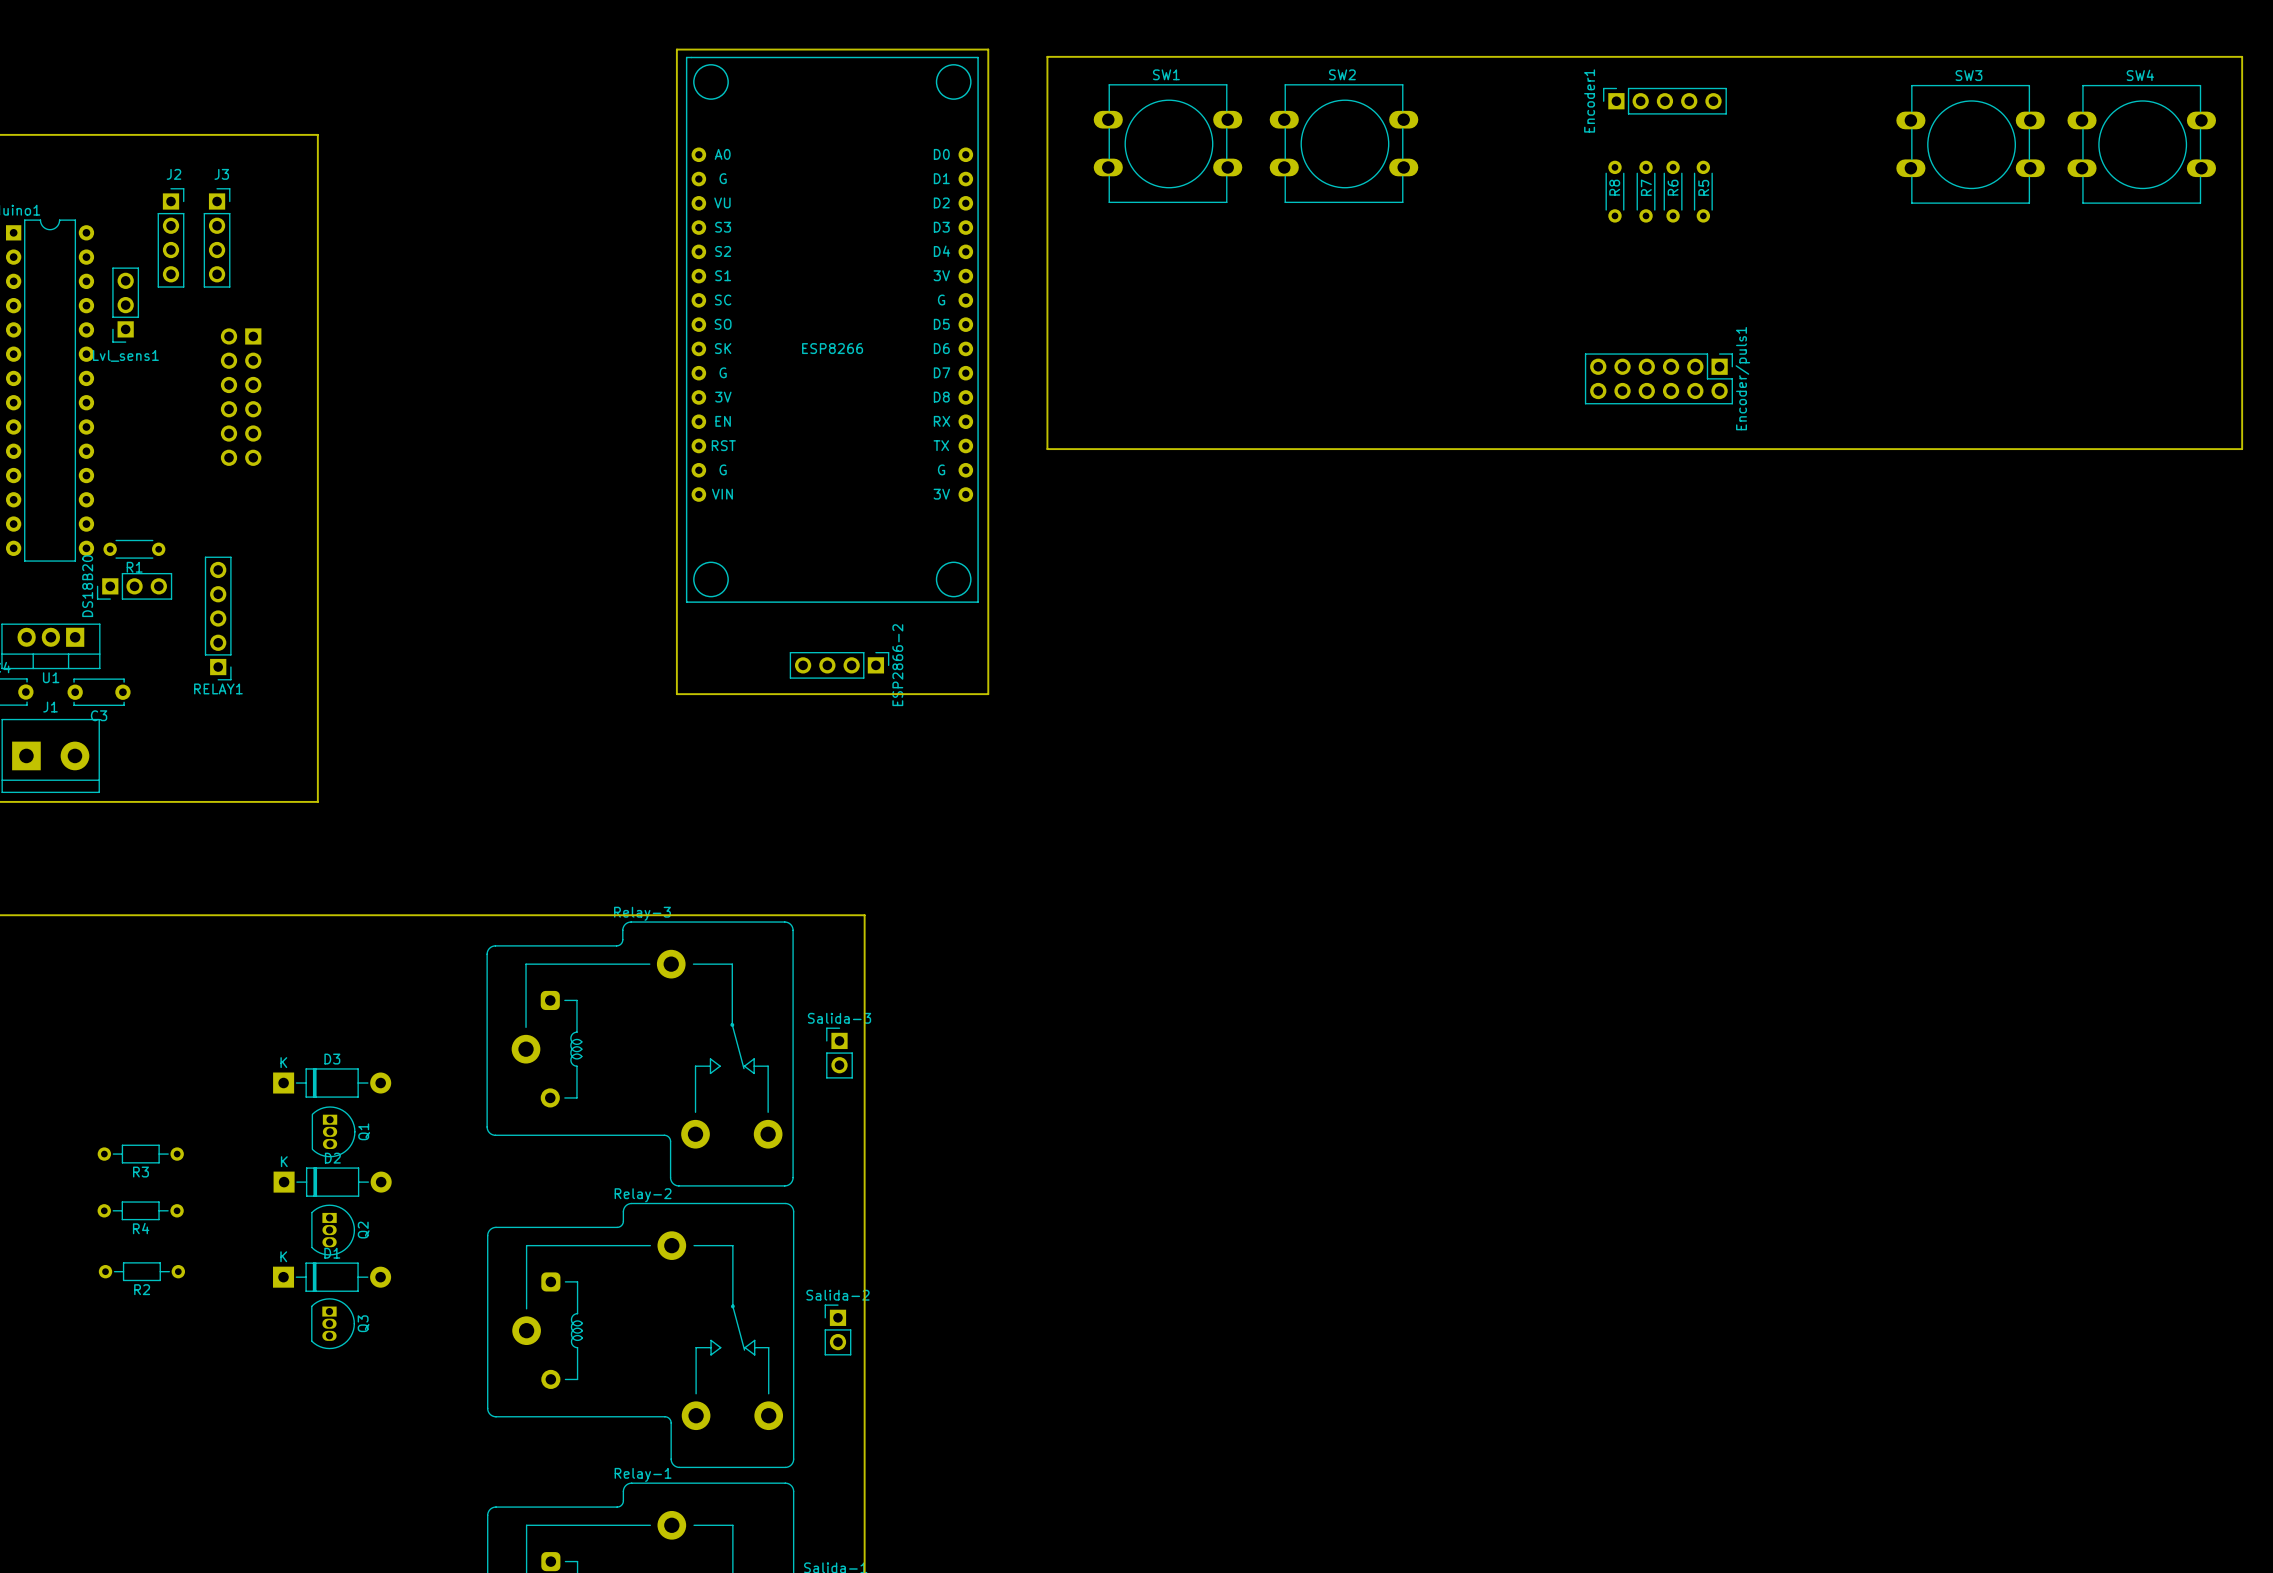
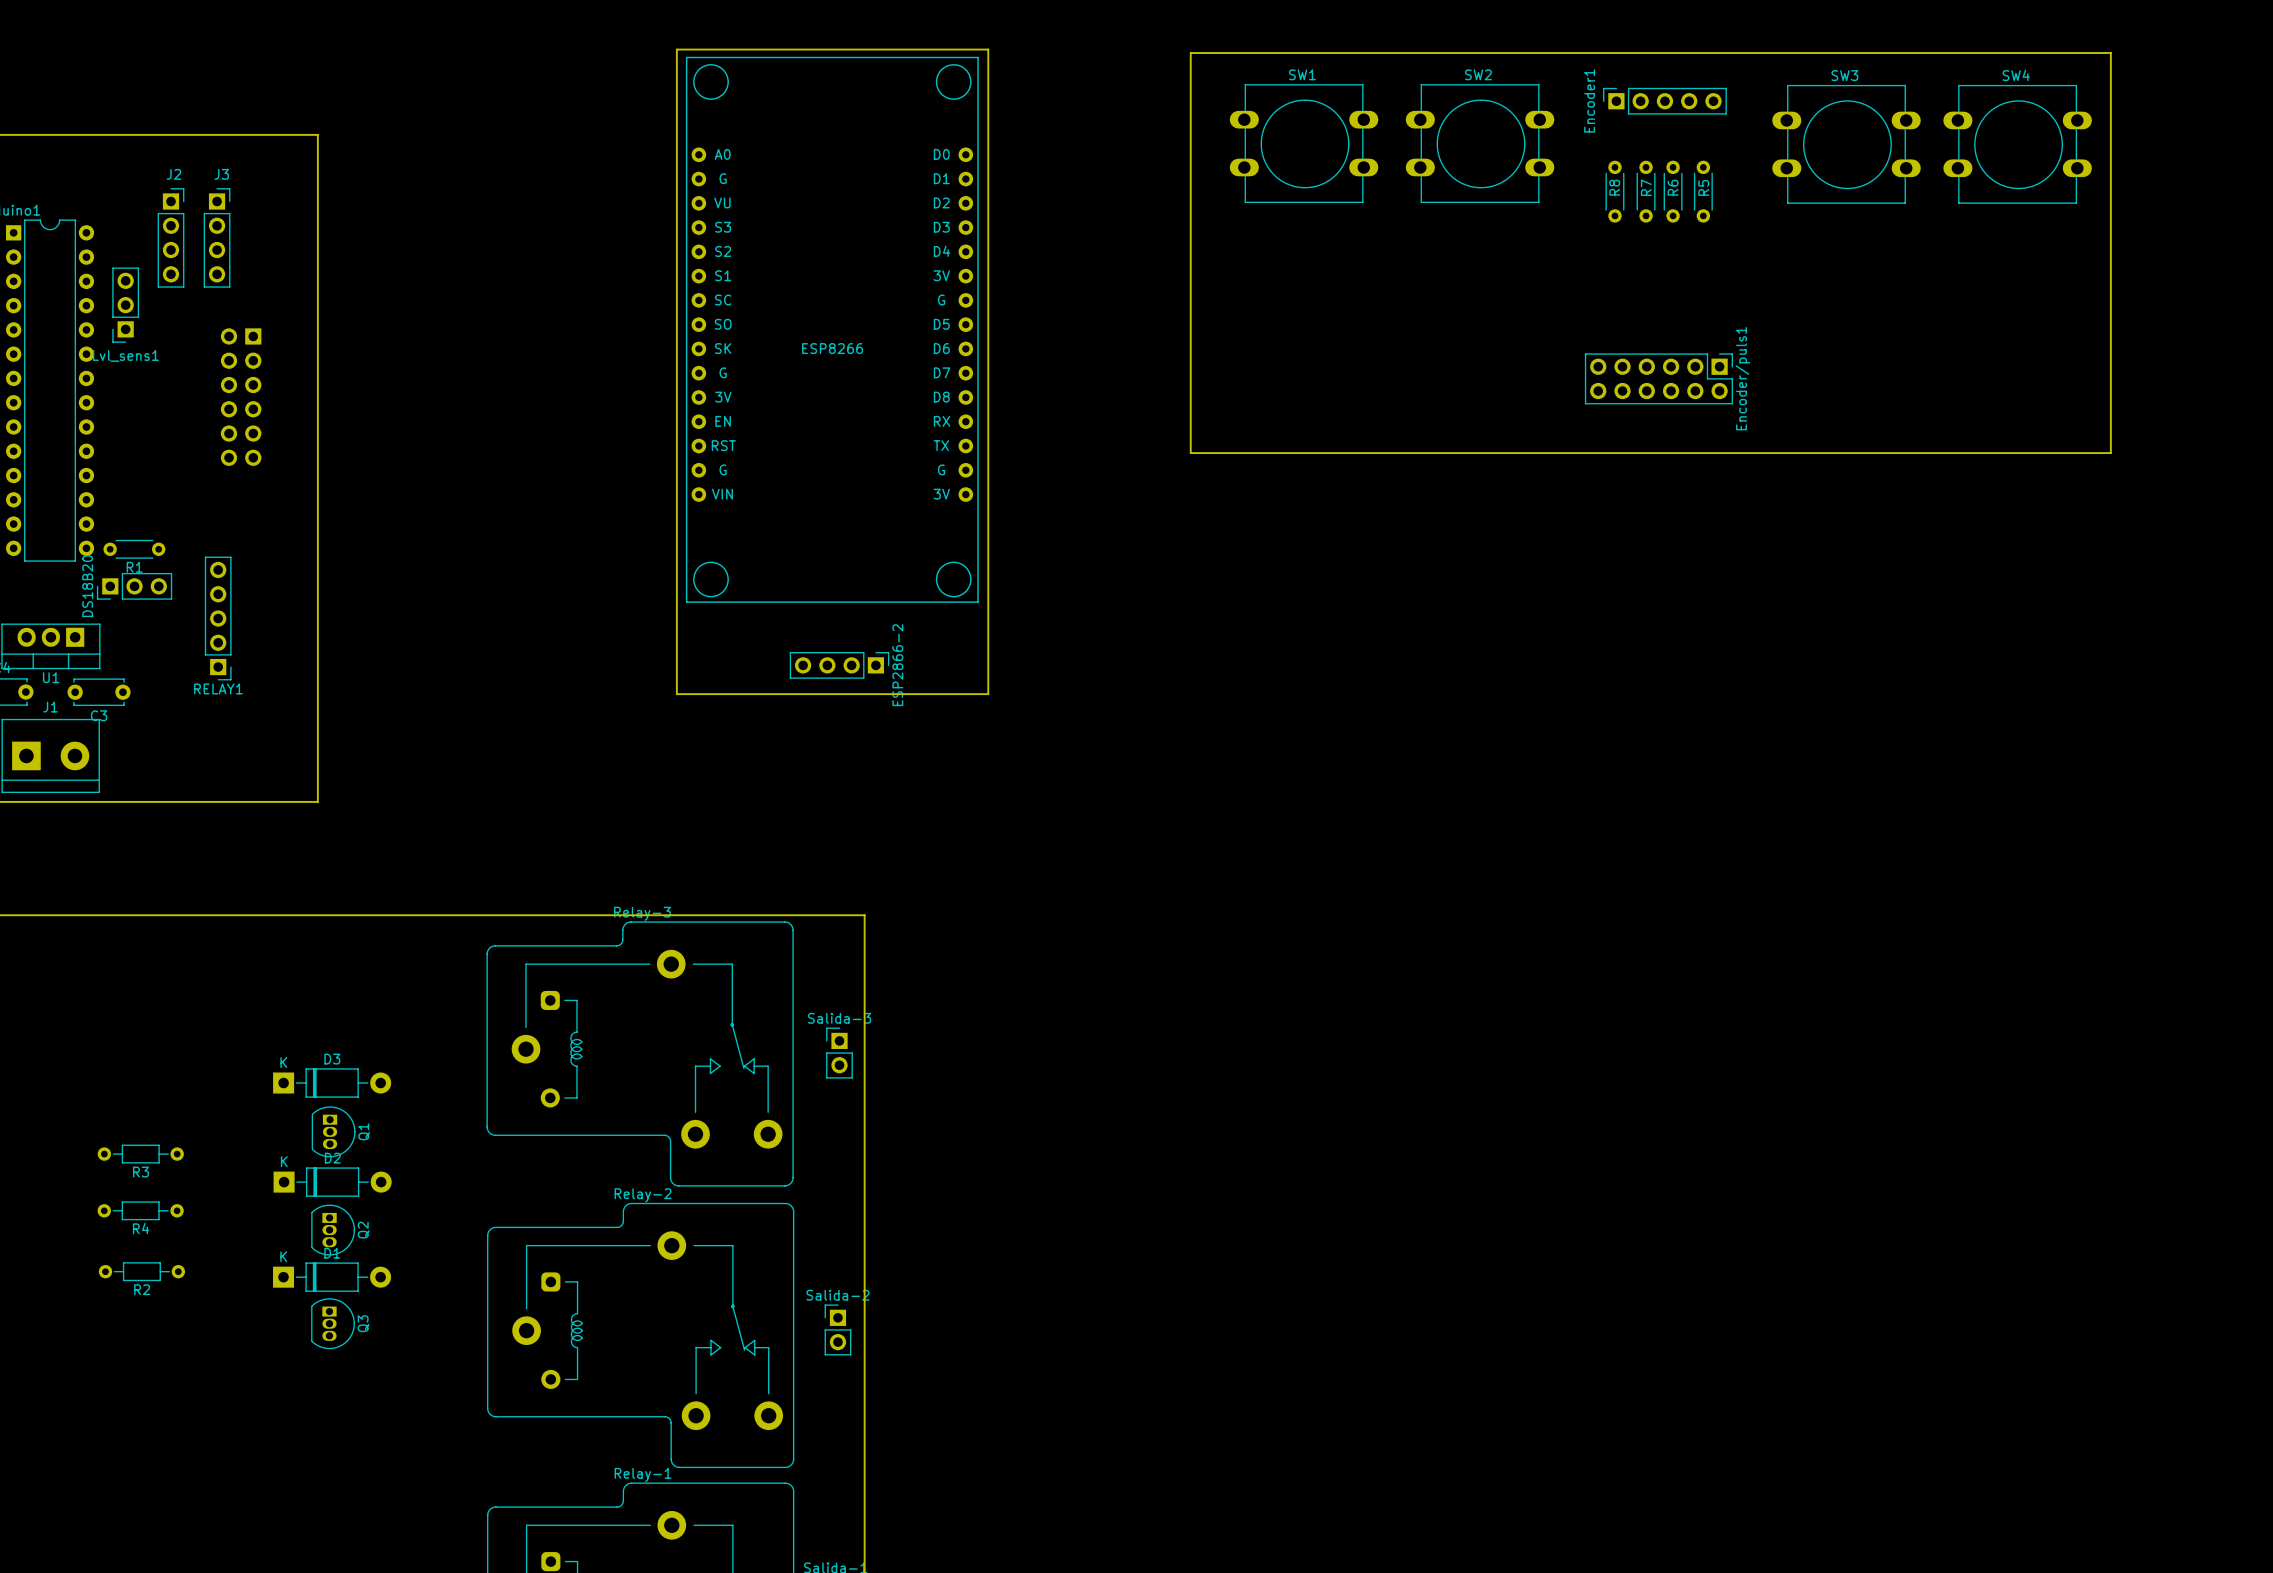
board edge: (1047, 56) (2242, 56) (2242, 449) (1047, 449) (1047, 56) -> (1190, 53) (1190, 453) (2110, 453) (2110, 53) (1190, 53)
SW1 position: (1168, 143) -> (1304, 143)
SW2 position: (1344, 143) -> (1480, 143)
SW3 position: (1970, 144) -> (1846, 144)
SW4 position: (2141, 144) -> (2017, 144)

